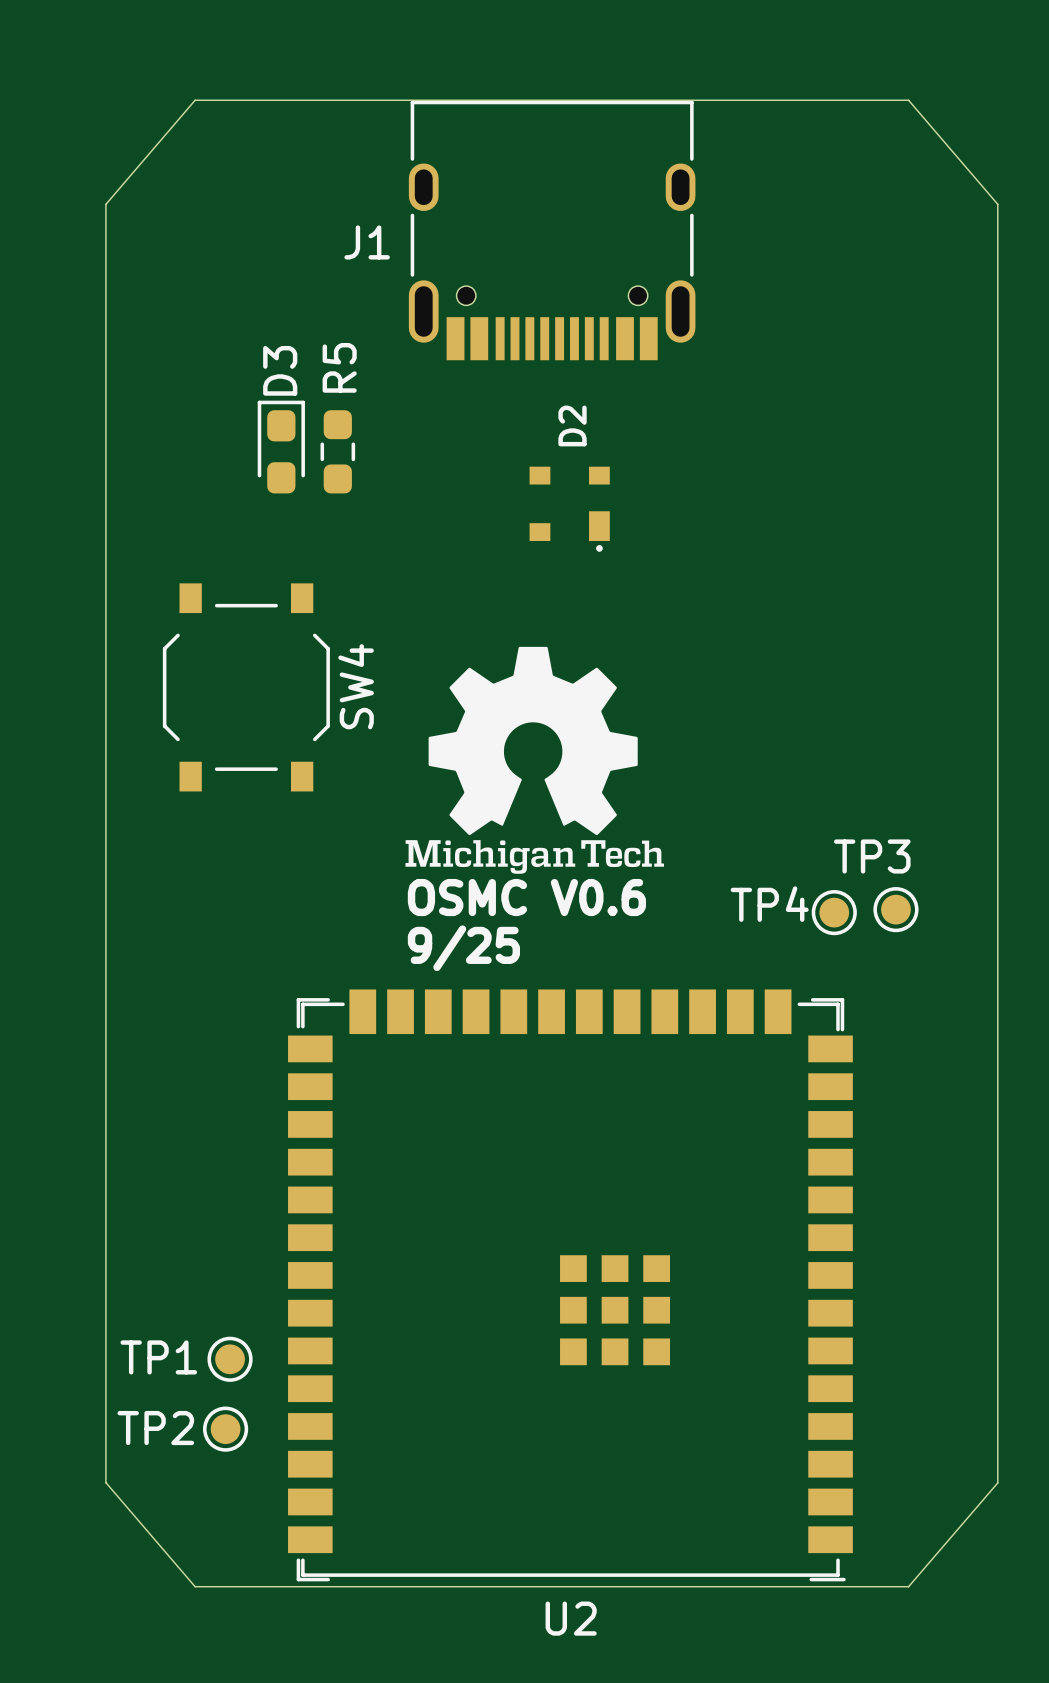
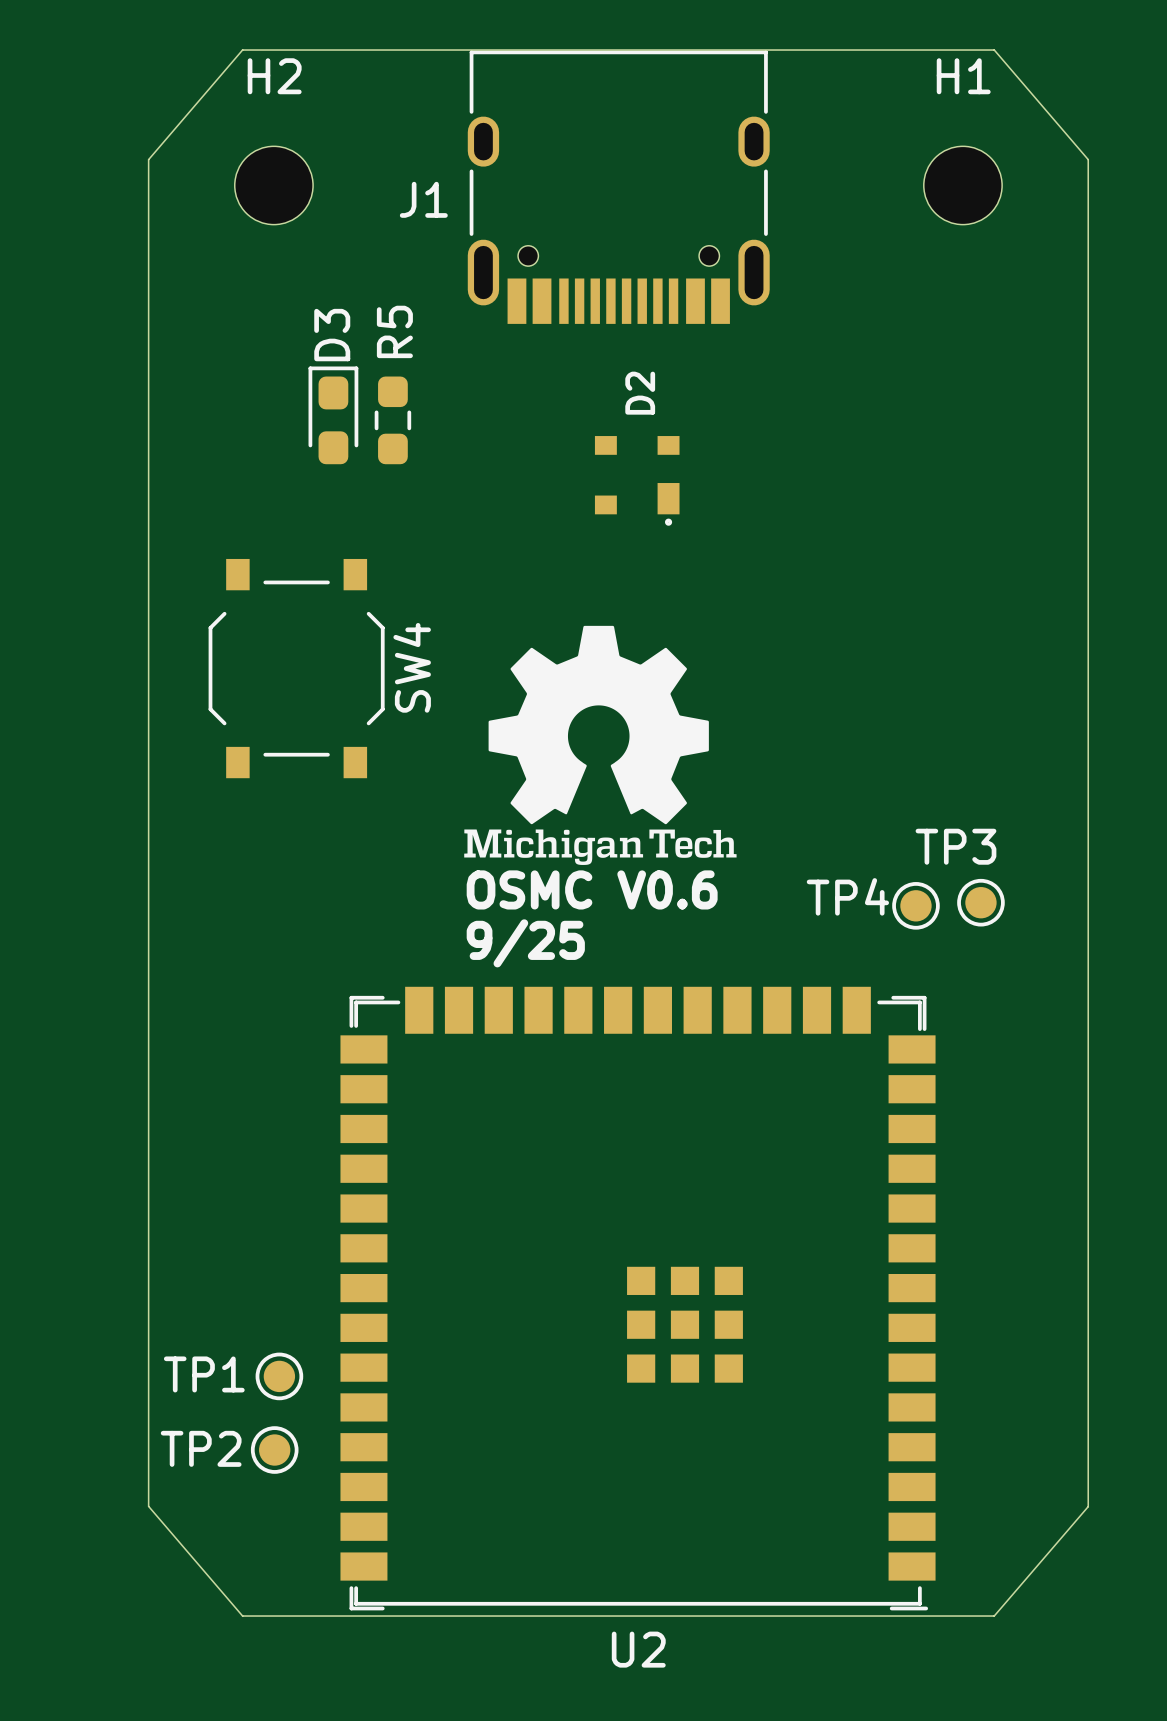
H2: none -> (273, 185)
H1: none -> (962, 185)

